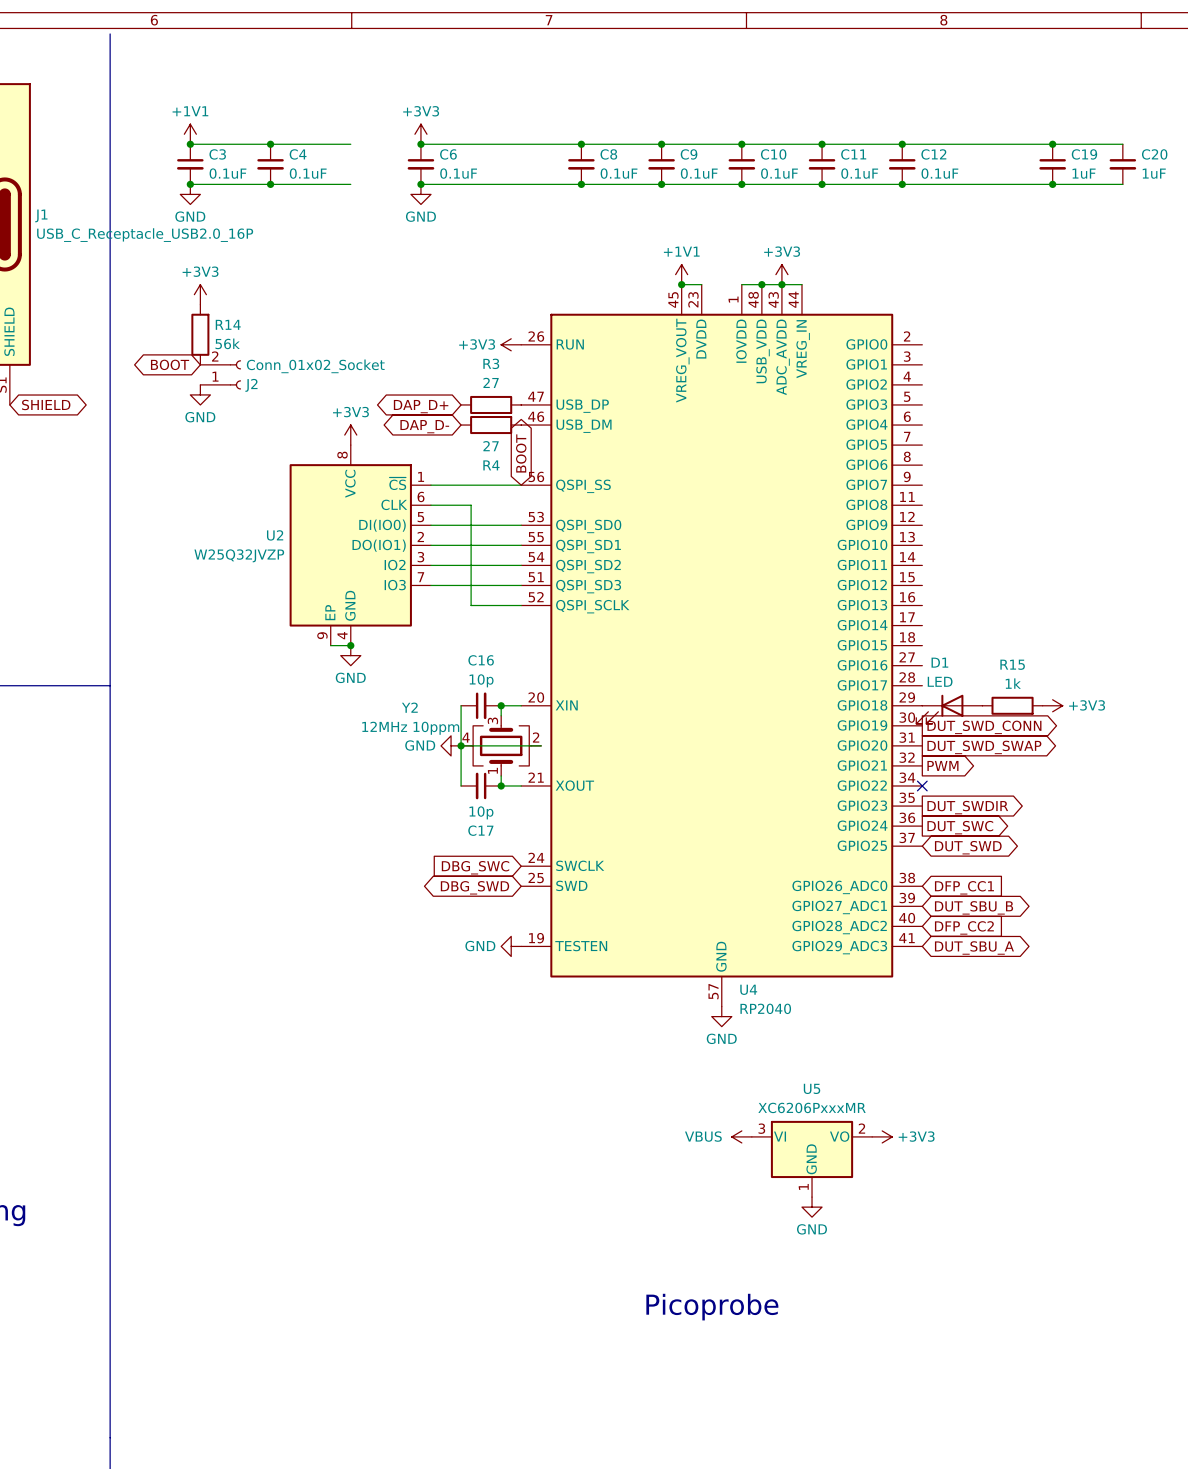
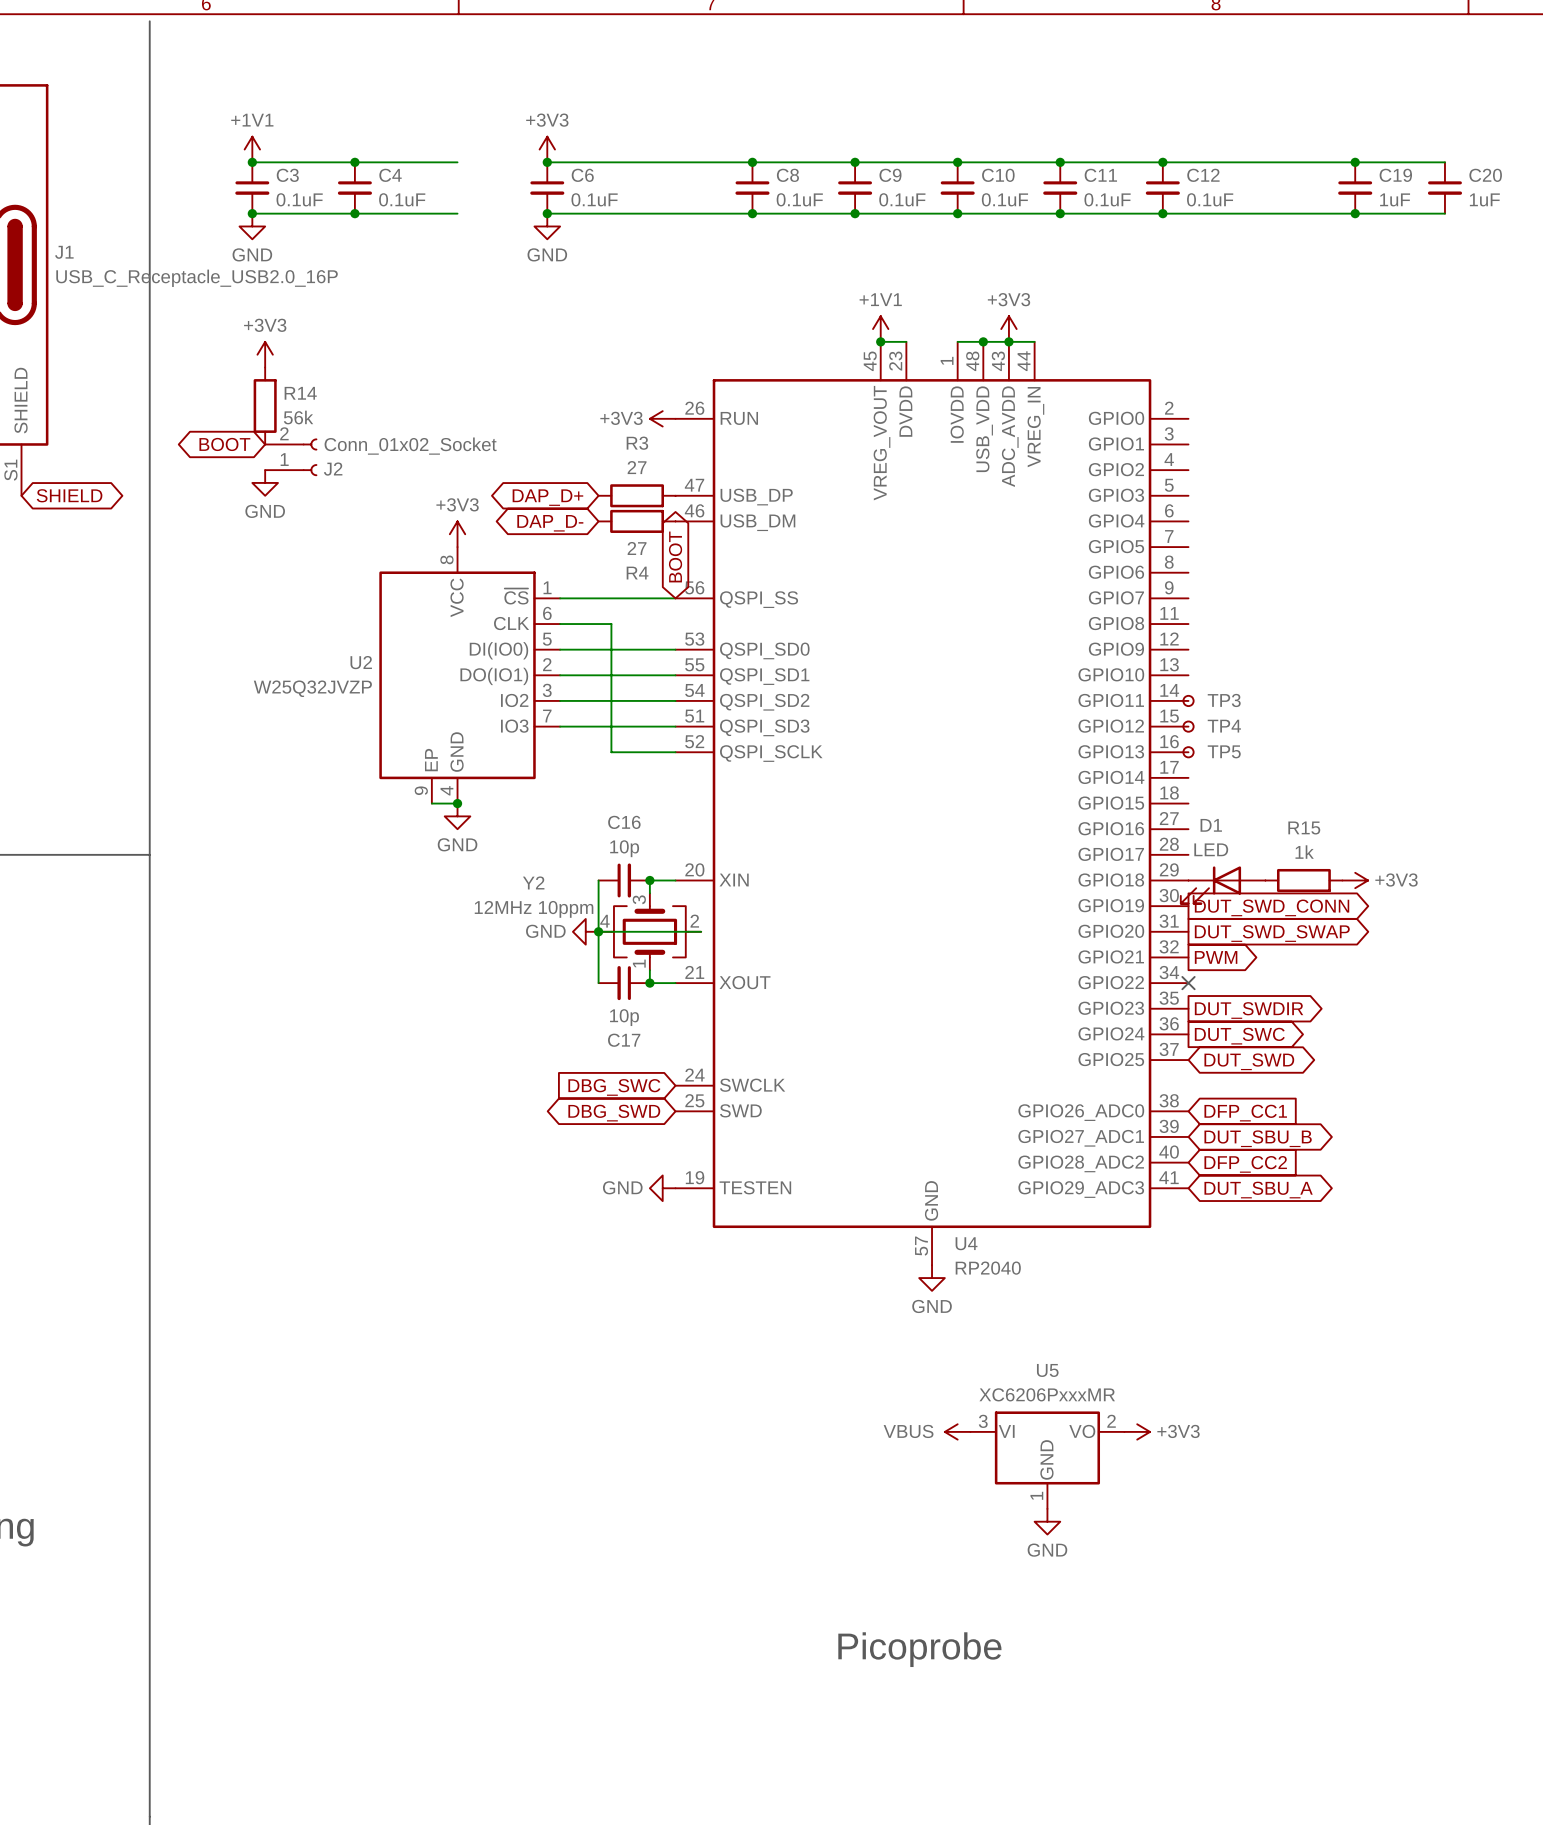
TP3: none -> (1188, 700)
TP4: none -> (1188, 726)
TP5: none -> (1188, 752)

